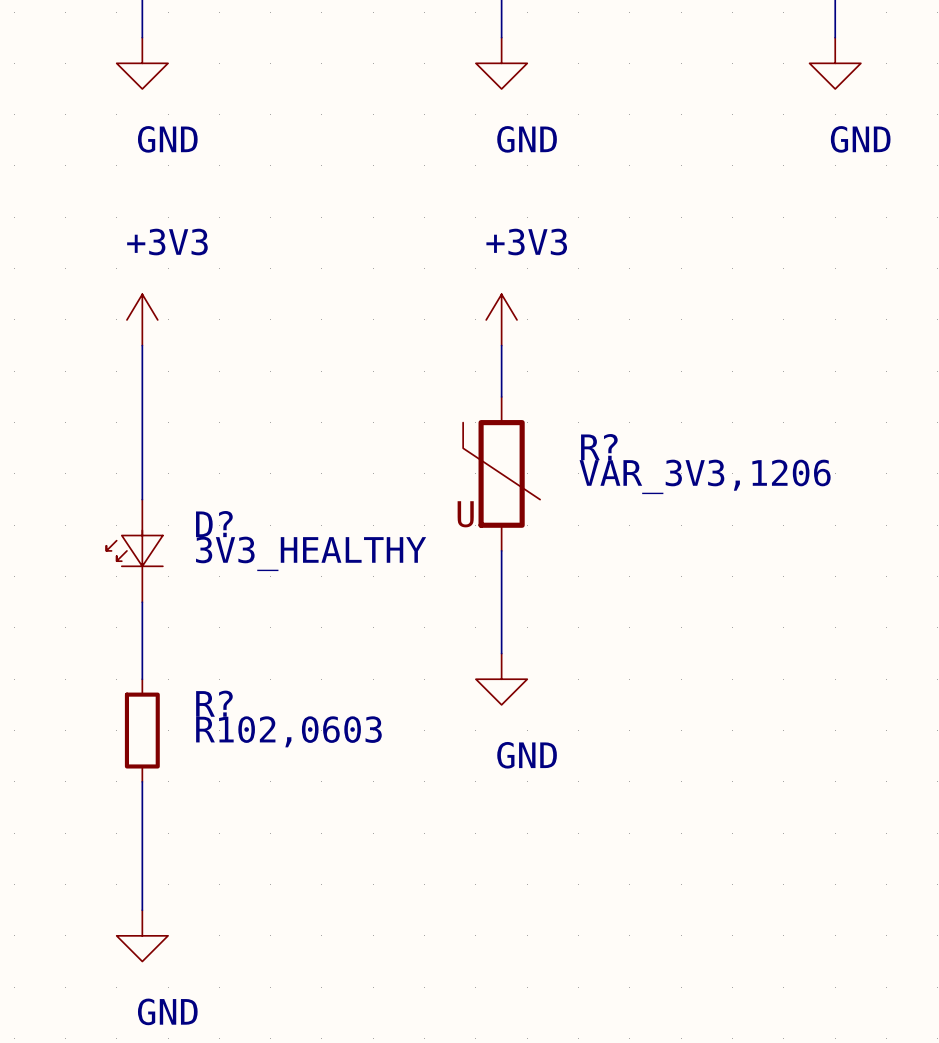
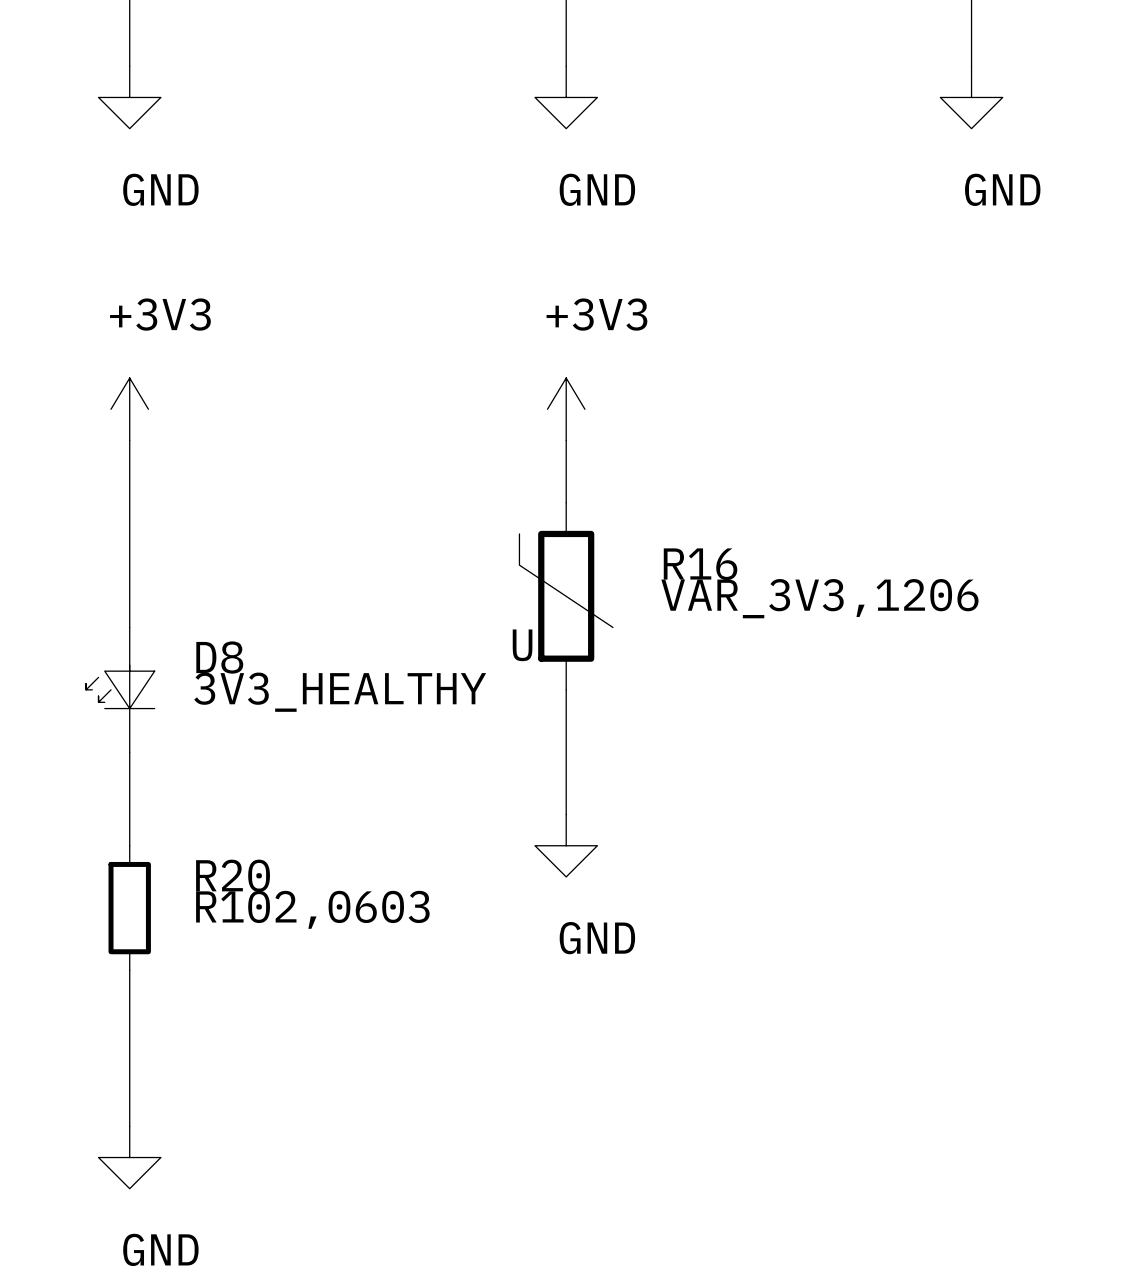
R? name: R? (599, 447) -> R16 (700, 564)
D? name: D? (214, 524) -> D8 (219, 657)
R? name: R? (214, 703) -> R20 (233, 875)

